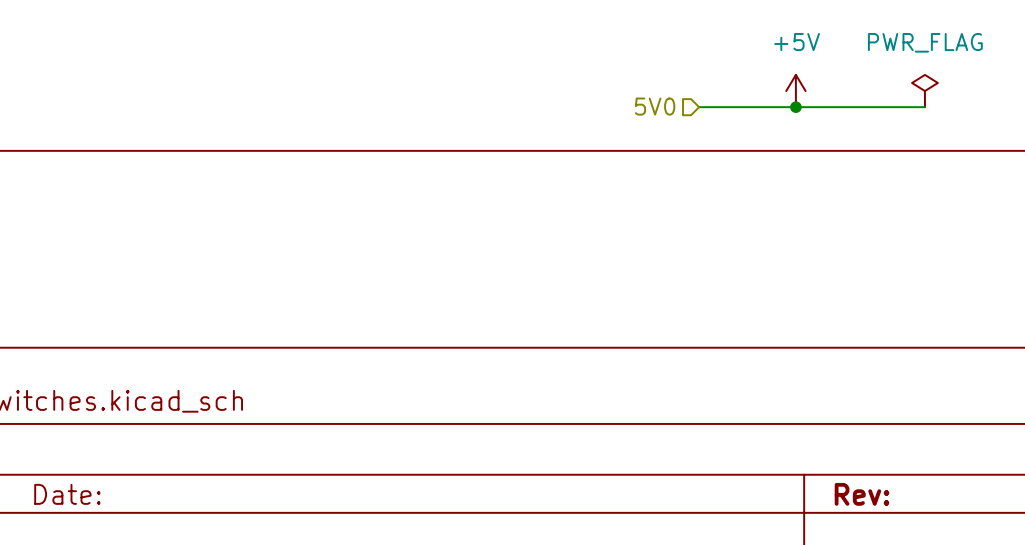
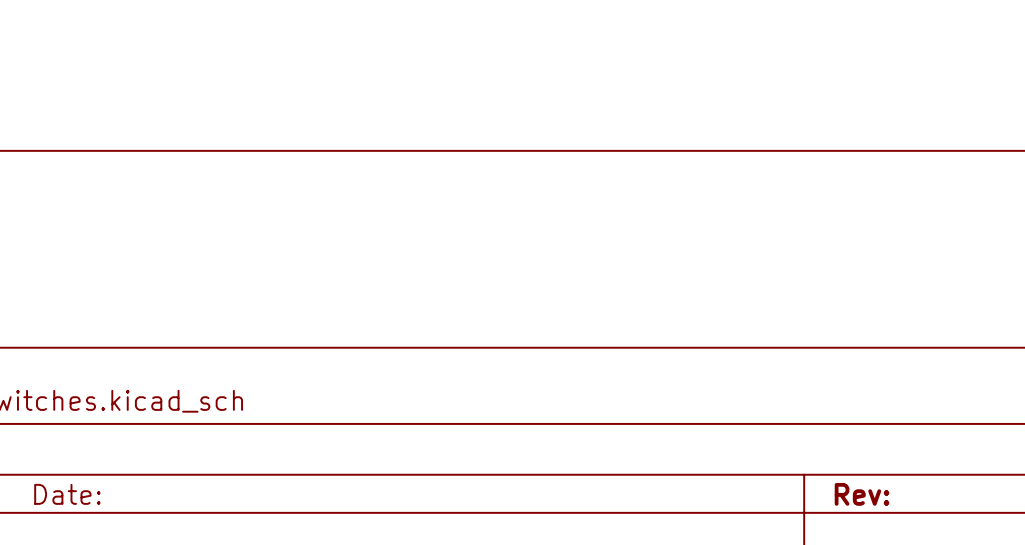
power symbol: +5V (795, 91) -> none
power symbol: PWR_FLAG (924, 91) -> none
hierarchical label: 5V0 (655, 106) -> none
wire: (699, 107) (924, 107) -> none
junction: (795, 107) -> none

